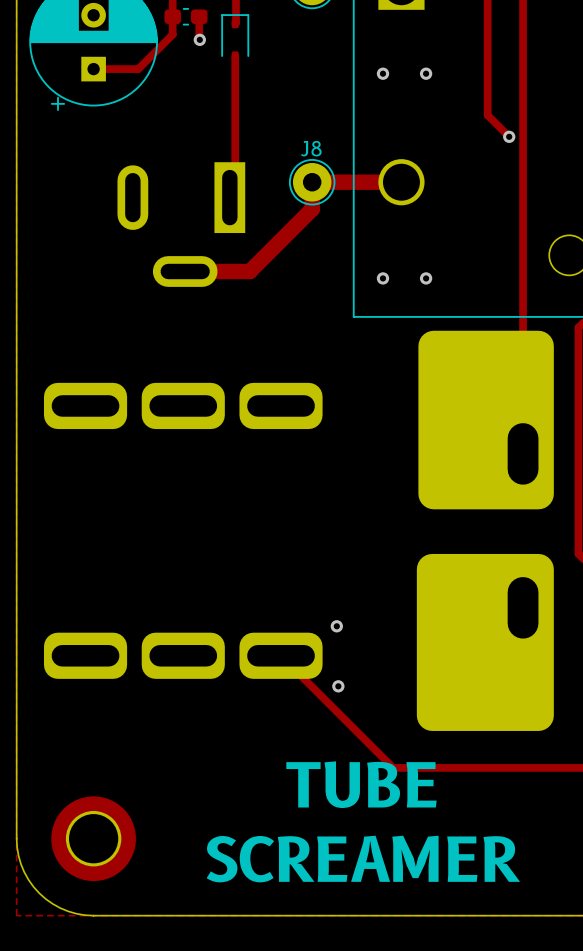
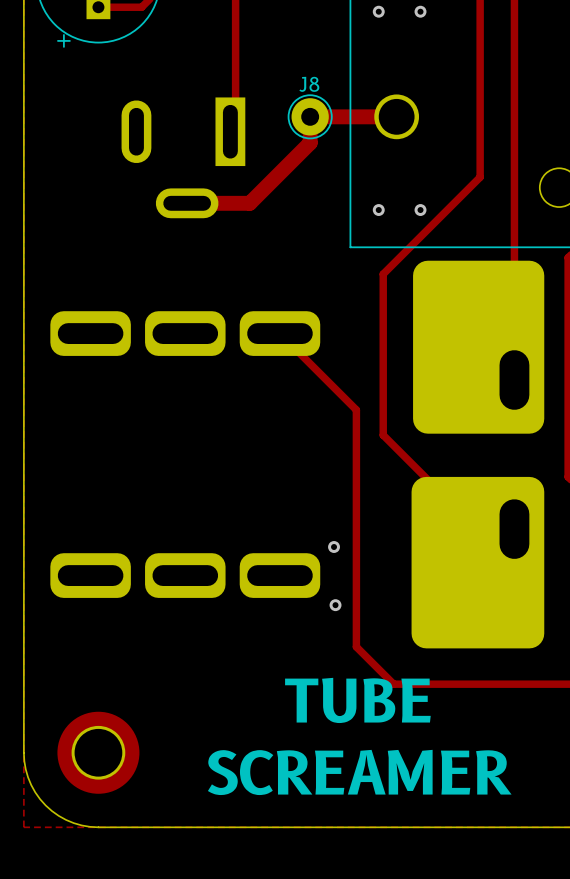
track: (487, 115) (509, 136) -> (480, 51) (480, 177) (383, 274) (383, 435) (477, 529) (514, 529)
via: (509, 136) -> none
track: none -> (279, 333) (356, 409) (356, 646) (393, 684)
track: (281, 655) (393, 767) -> none

